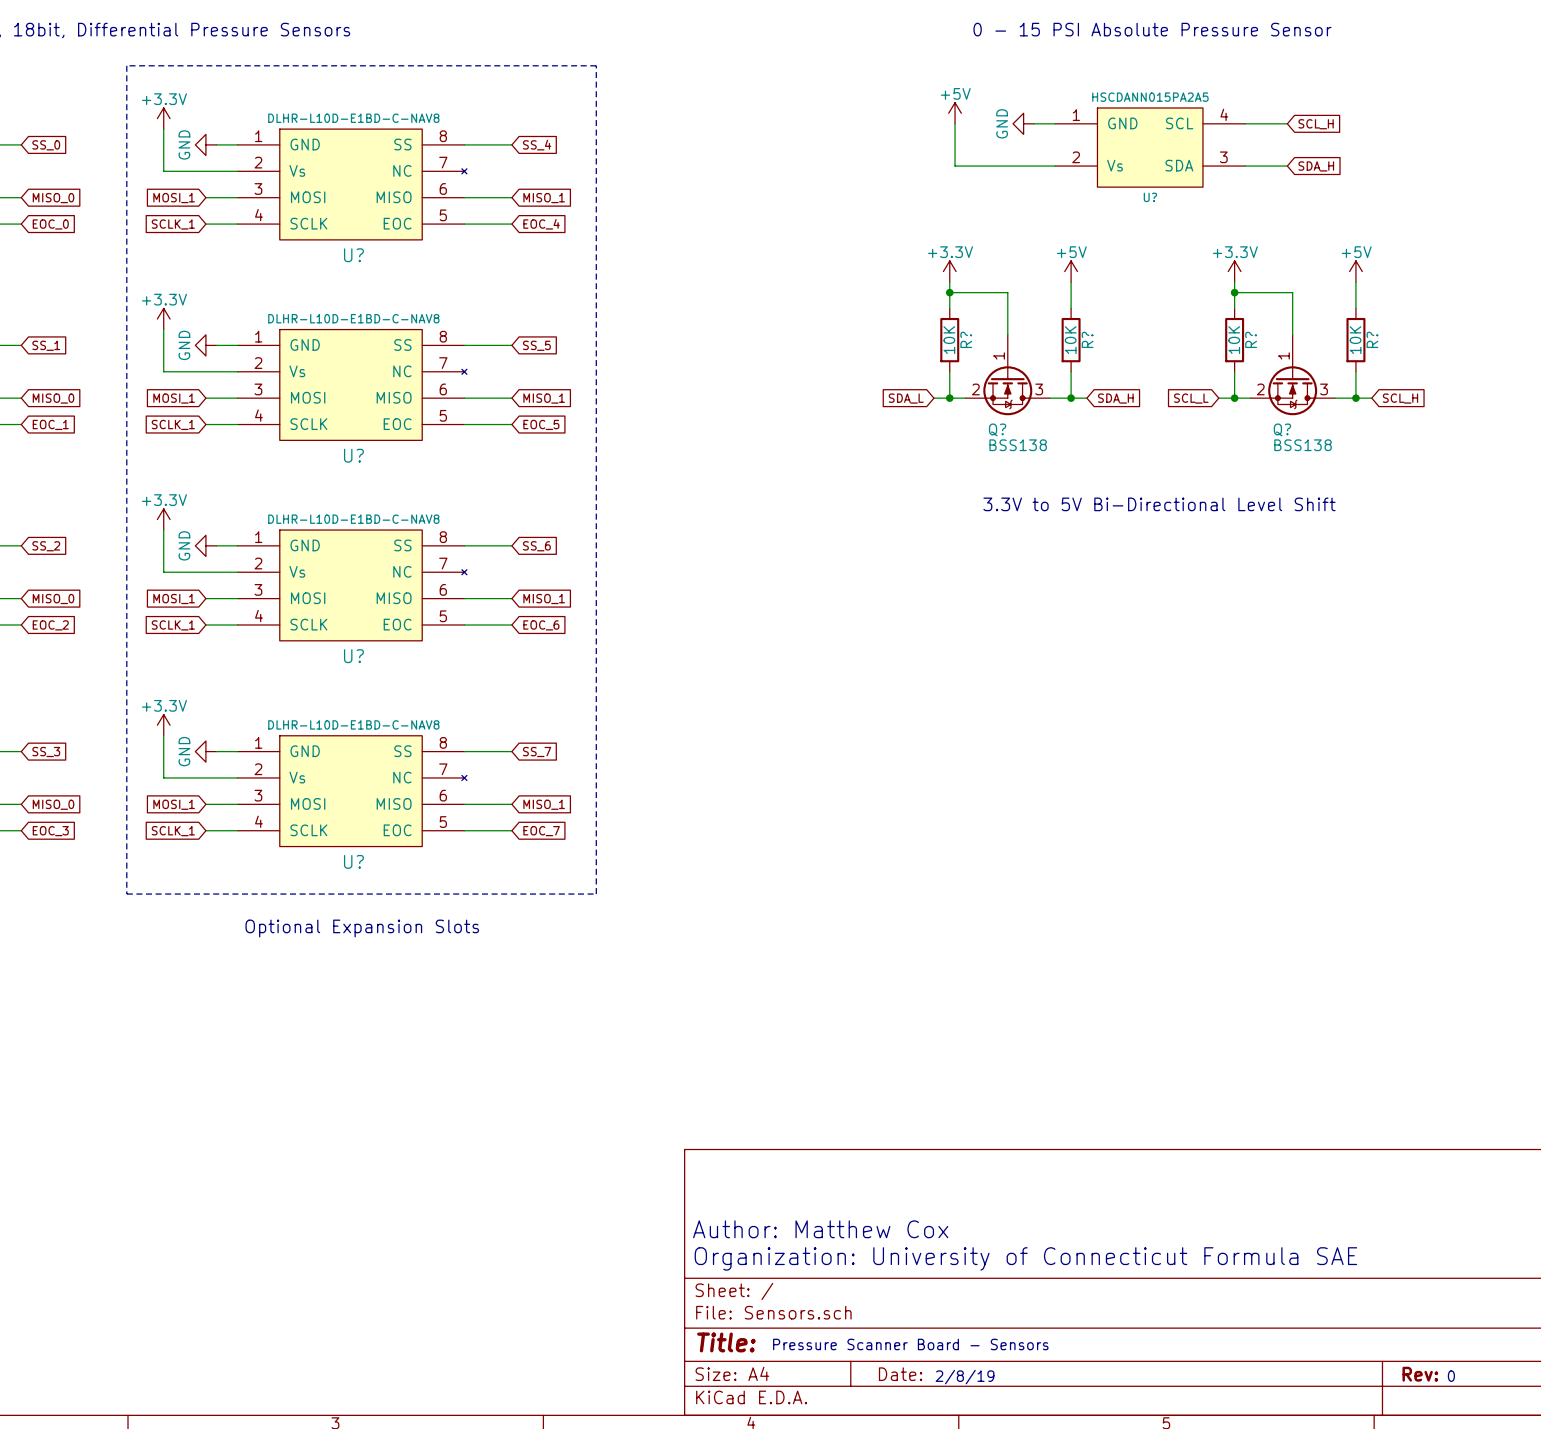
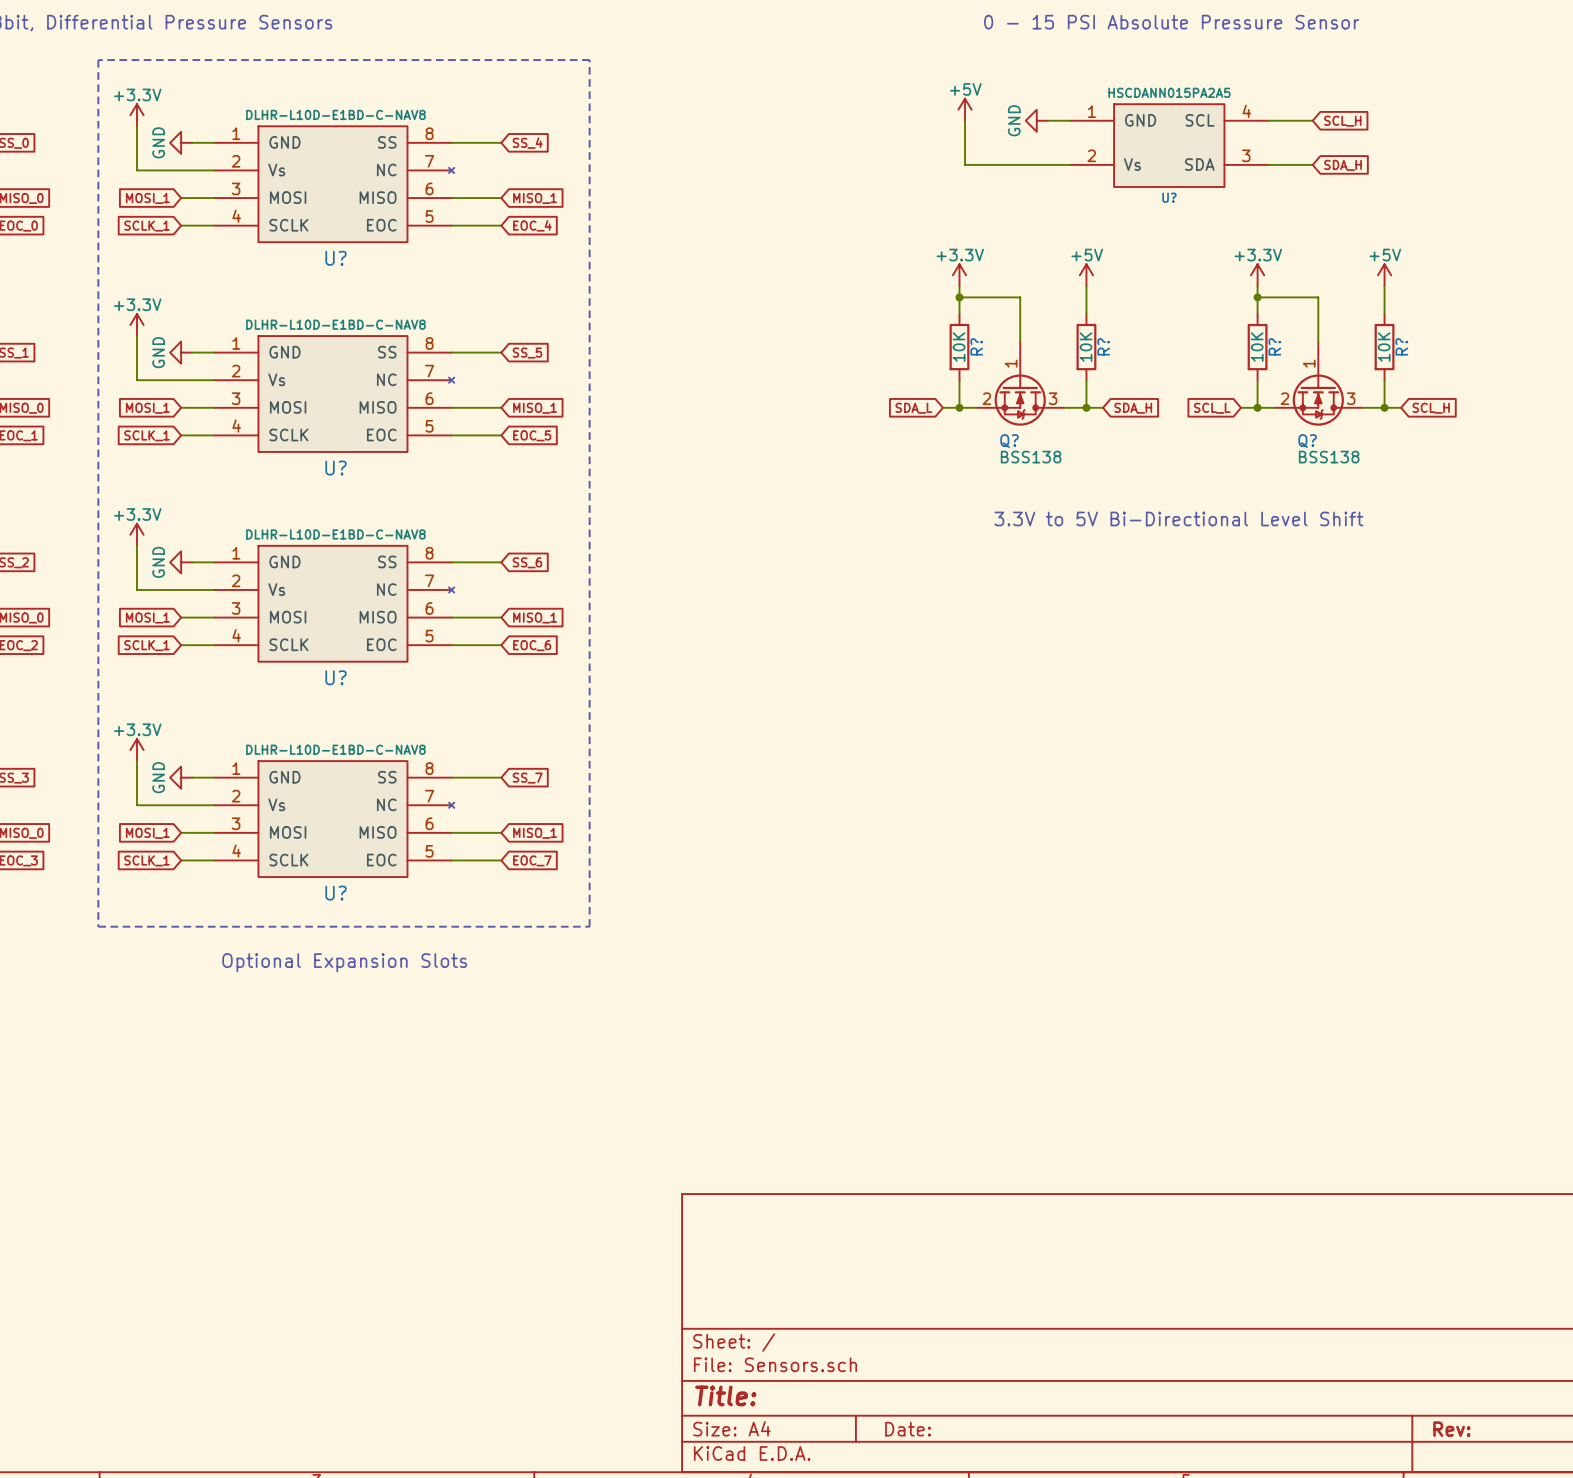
text: Author: Matthew Cox (820, 1229) -> none
text: Organization: University of Connecticut Formula SAE (1025, 1258) -> none
text: Pressure Scanner Board - Sensors (910, 1344) -> none
text: 0 (1451, 1376) -> none
text: 2/8/19 (965, 1377) -> none

